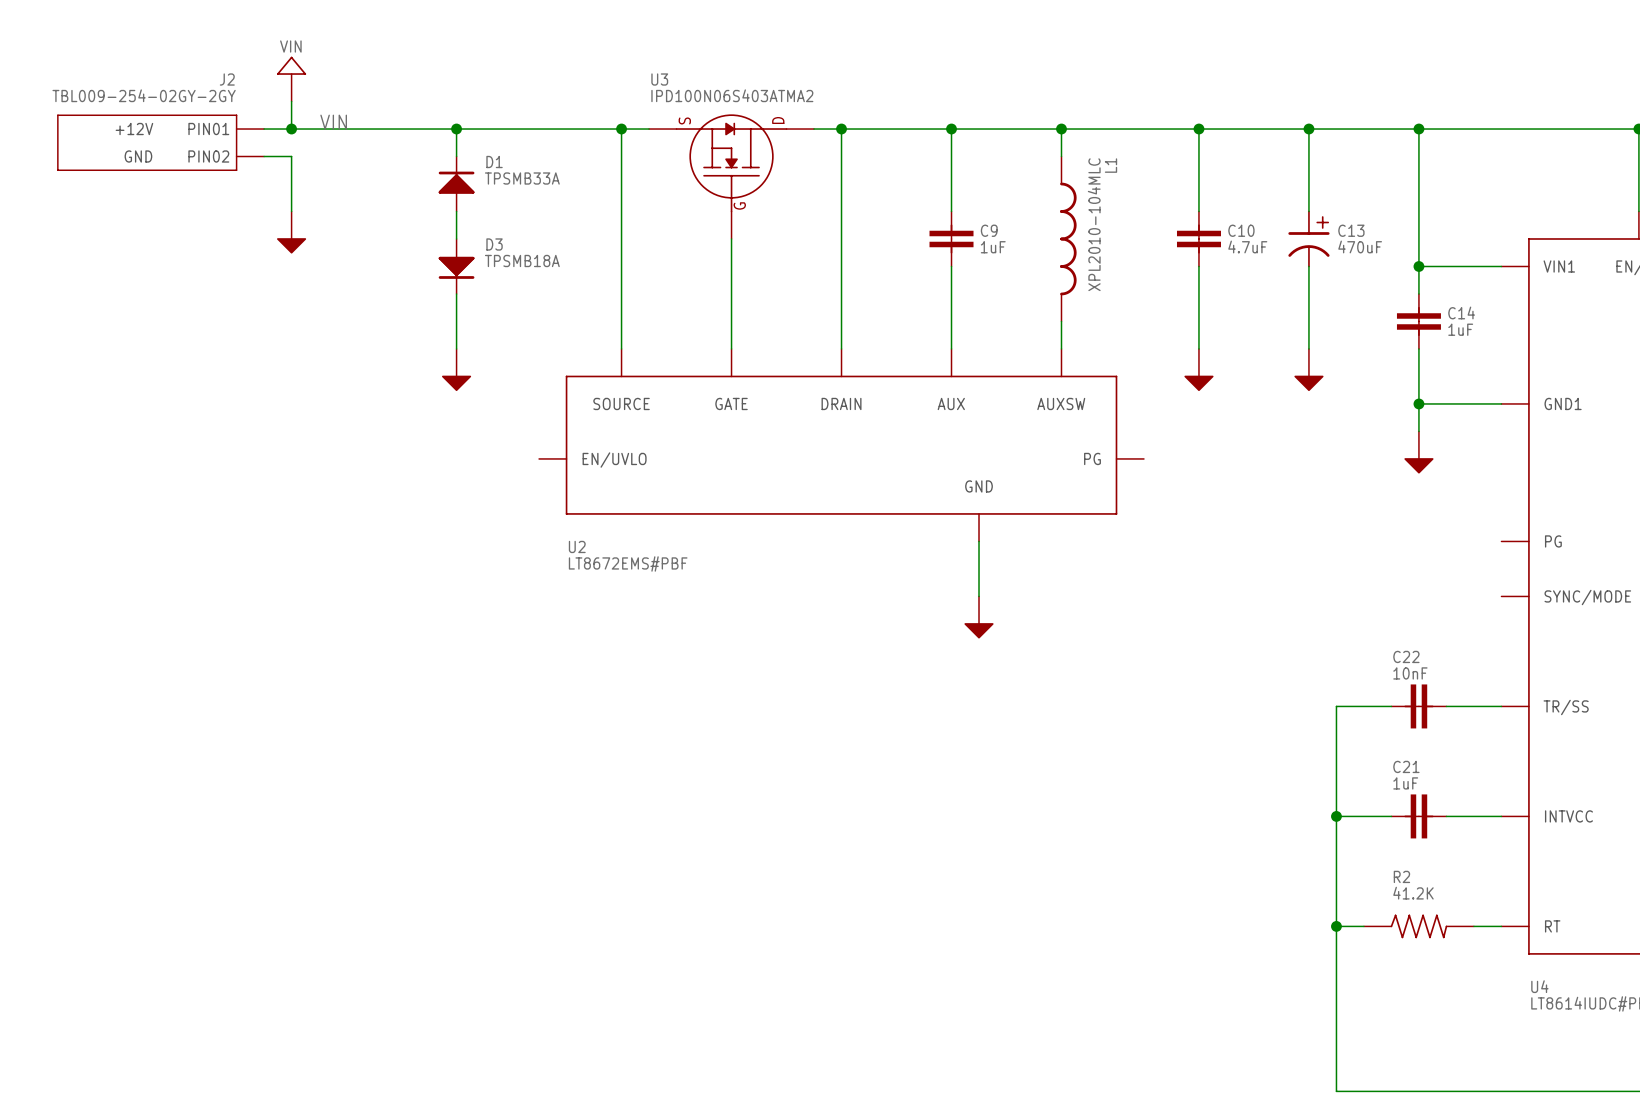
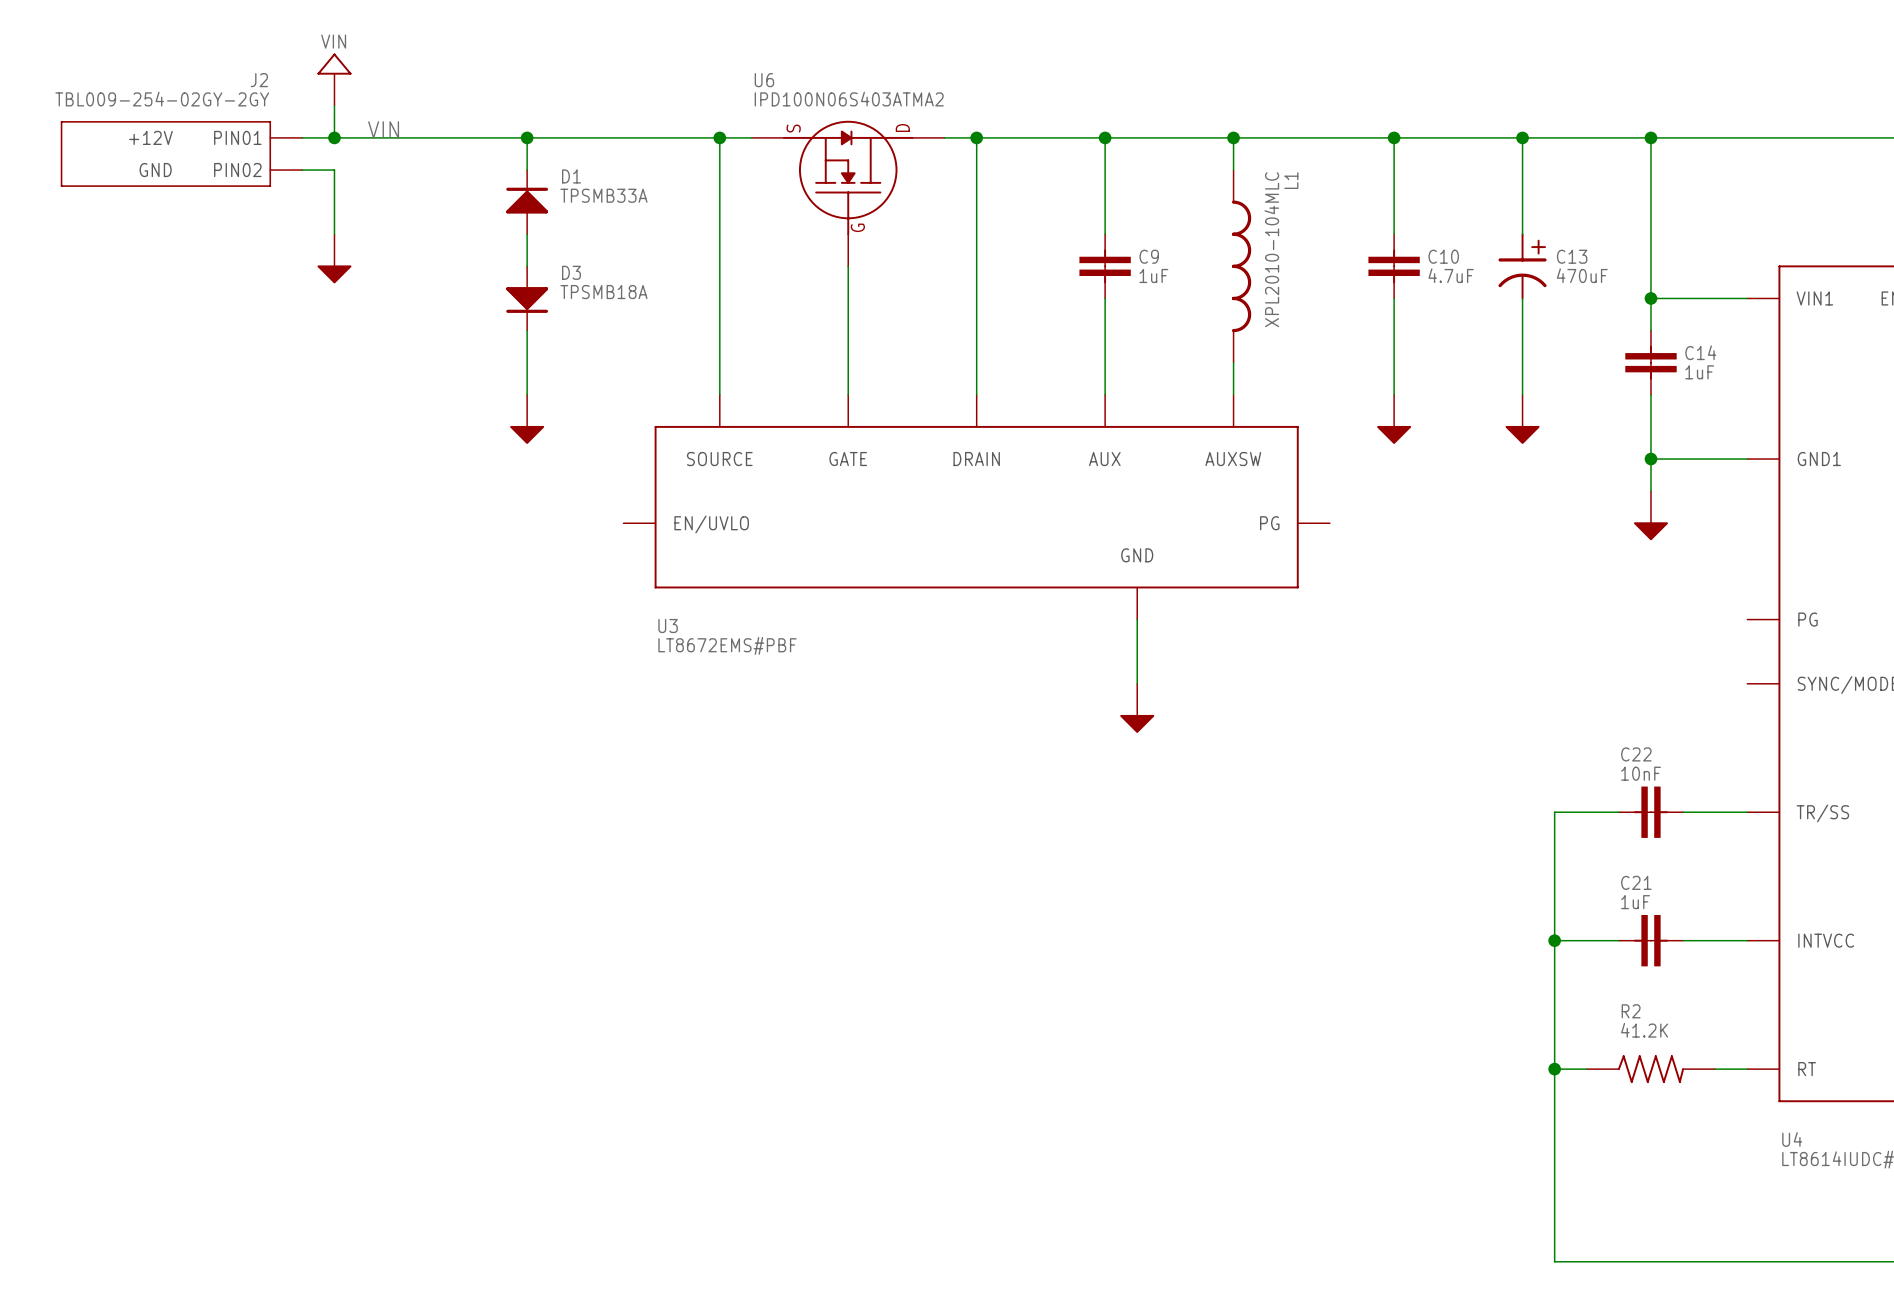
U3 name: U3 (659, 79) -> U6 (764, 80)
U2 name: U2 (577, 546) -> U3 (668, 626)

